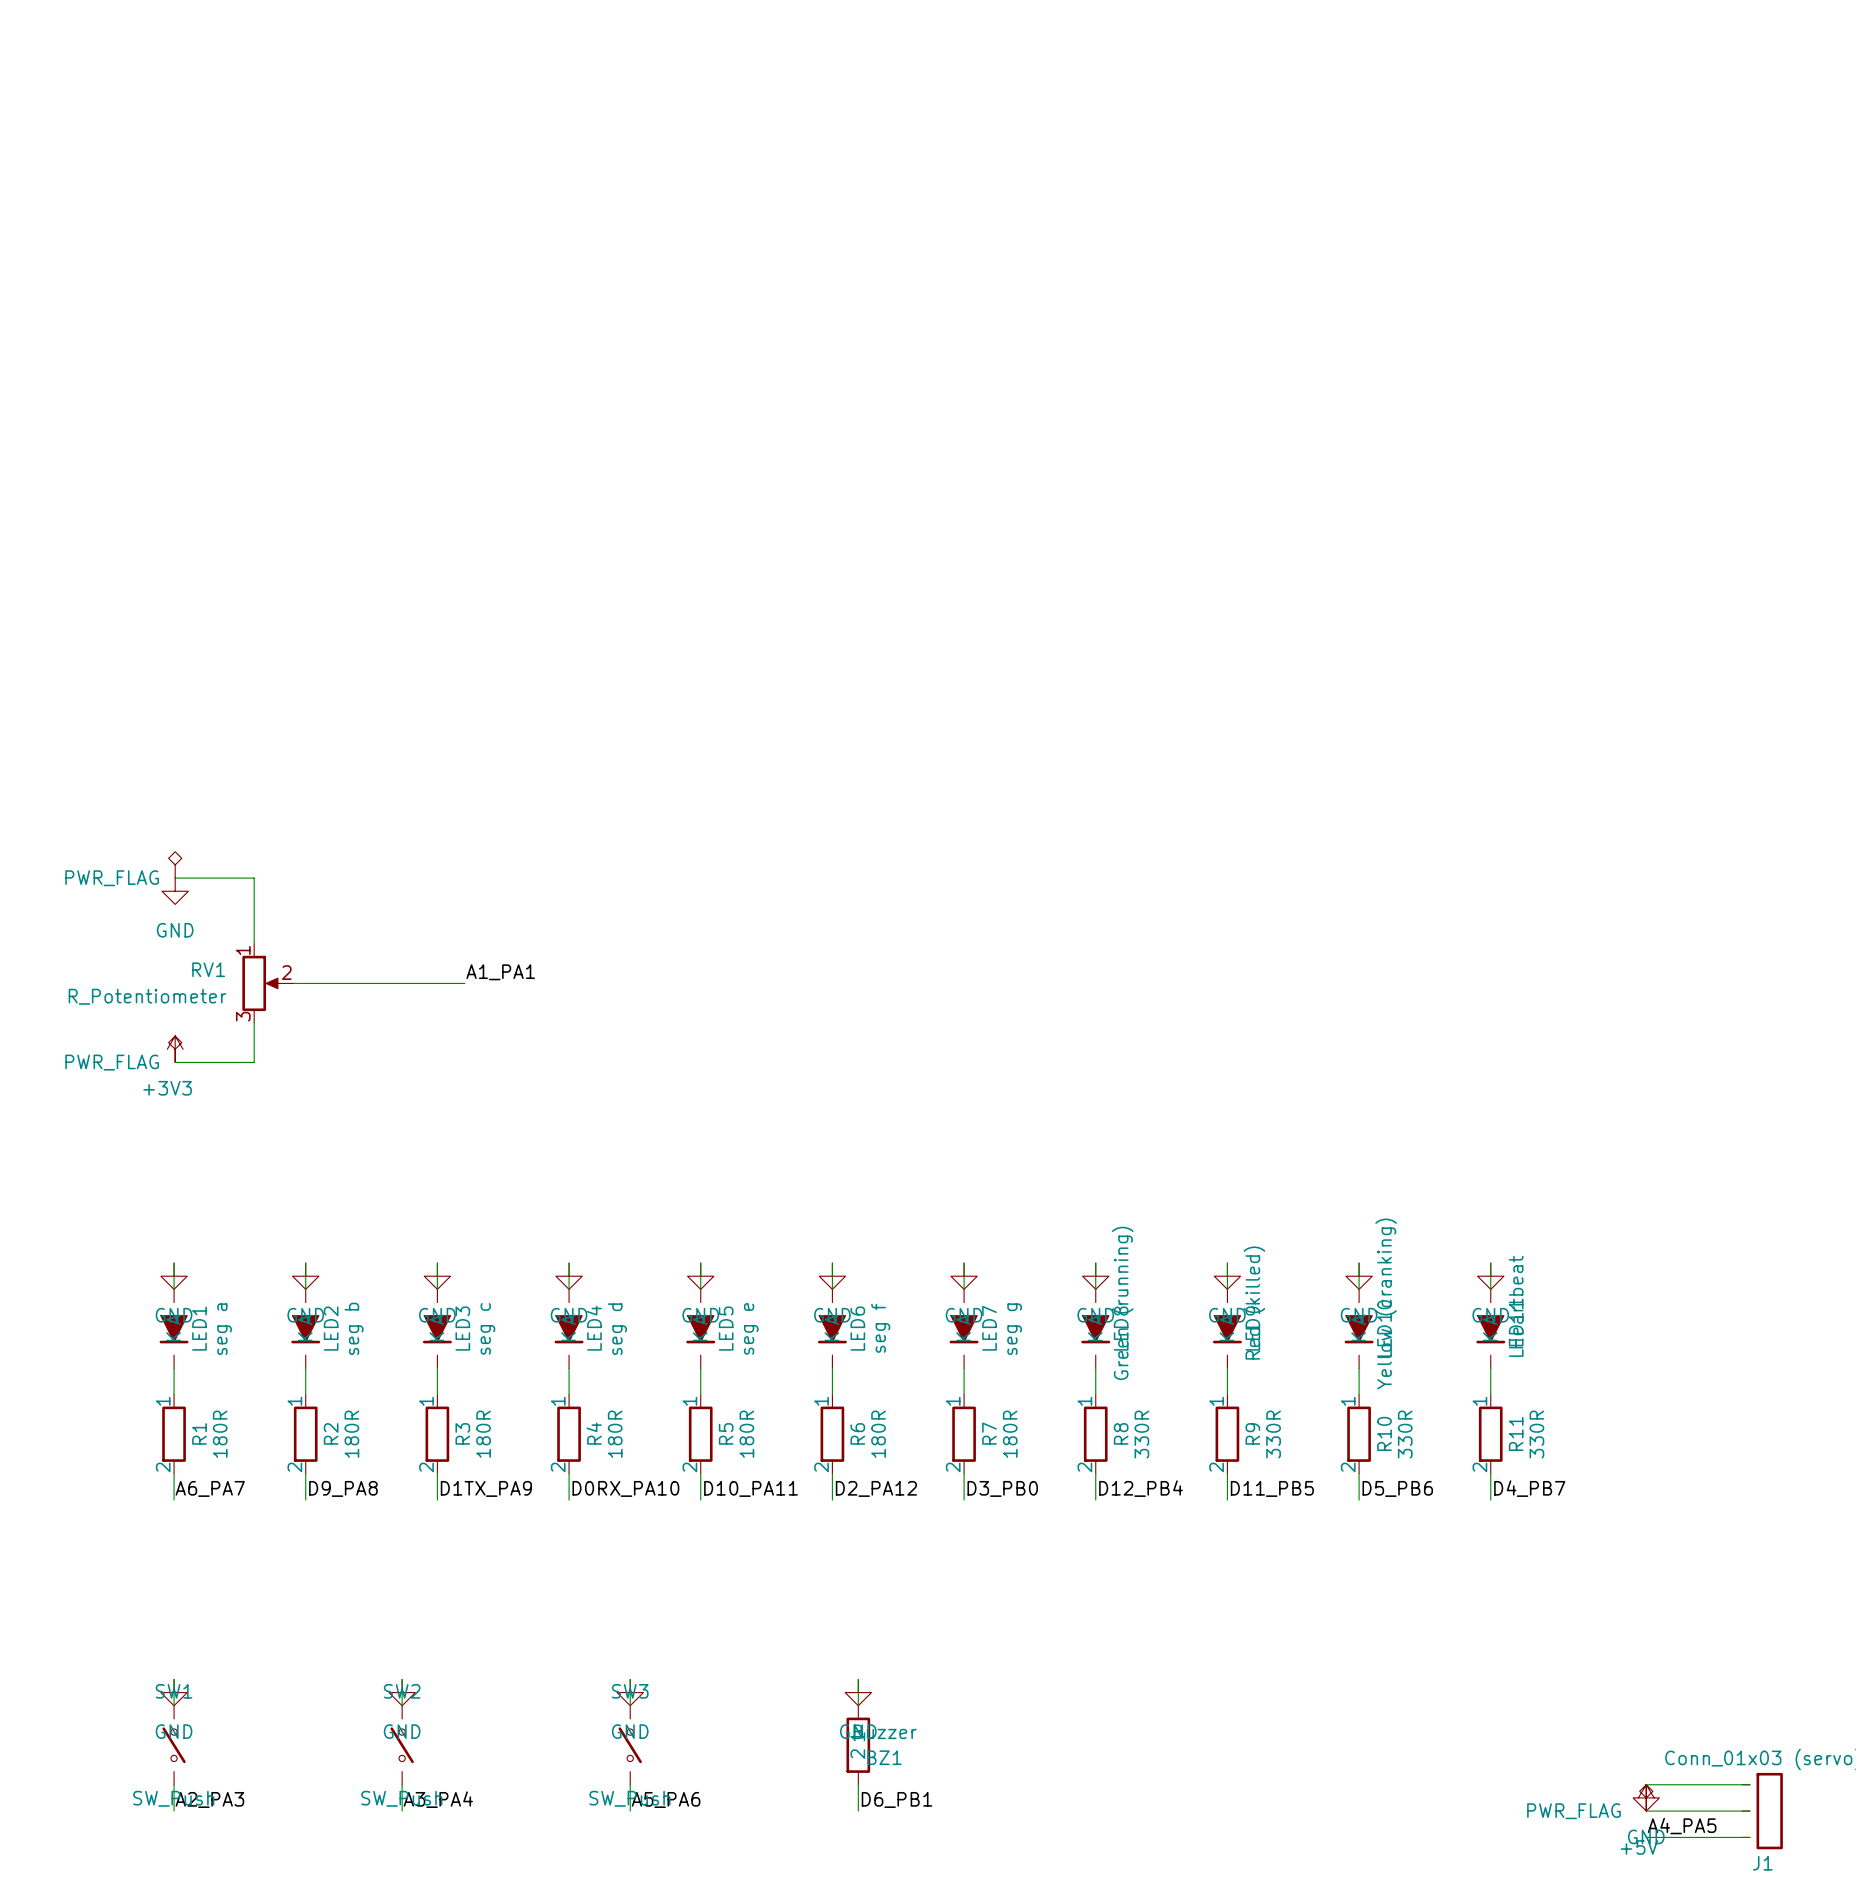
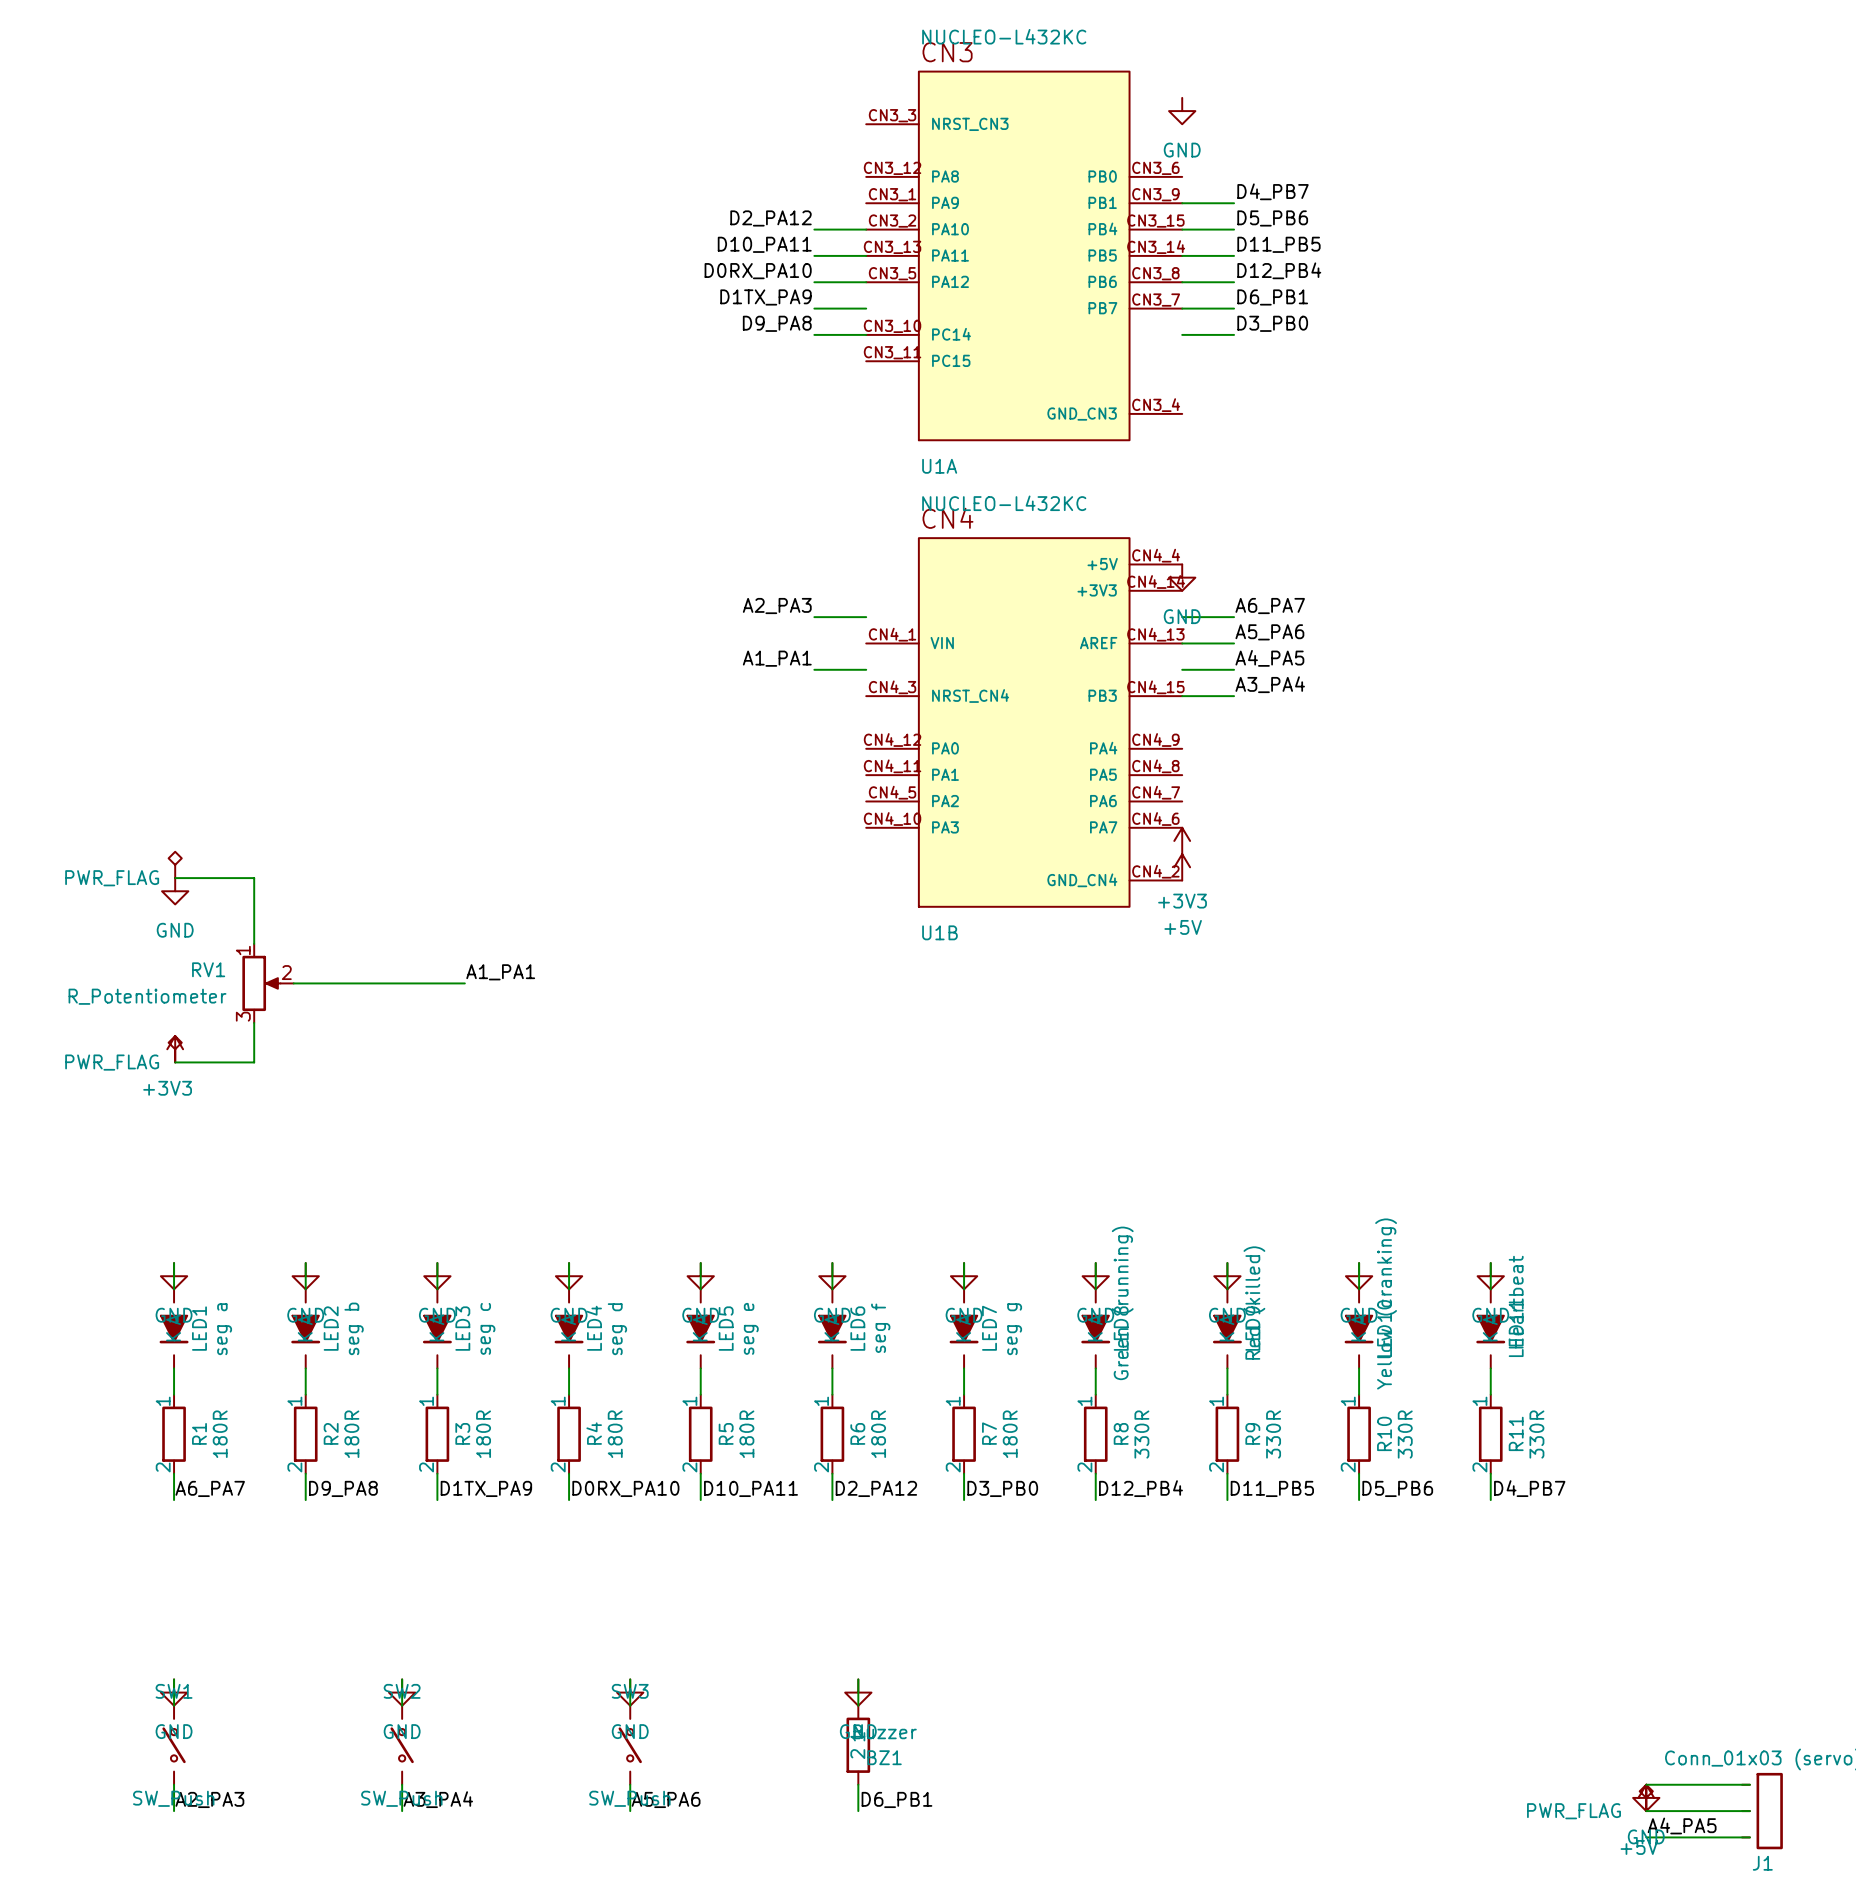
power symbol: none -> GND (1182, 111)
label: none -> D4_PB7 (1273, 191)
wire: none -> (1182, 203) (1234, 203)
label: none -> D2_PA12 (771, 218)
label: none -> D5_PB6 (1272, 218)
wire: none -> (814, 229) (866, 229)
wire: none -> (1182, 229) (1234, 229)
label: none -> D10_PA11 (764, 244)
label: none -> D11_PB5 (1278, 244)
wire: none -> (814, 255) (866, 255)
U1A: none -> NUCLEO-L432KC (1024, 255)
wire: none -> (1182, 255) (1234, 255)
label: none -> D12_PB4 (1279, 270)
label: none -> D0RX_PA10 (758, 271)
wire: none -> (814, 282) (866, 282)
wire: none -> (1182, 282) (1234, 282)
label: none -> D1TX_PA9 (765, 297)
label: none -> D6_PB1 (1272, 297)
wire: none -> (814, 308) (866, 308)
wire: none -> (1182, 308) (1234, 308)
label: none -> D9_PA8 (777, 323)
label: none -> D3_PB0 (1272, 323)
wire: none -> (814, 334) (866, 334)
wire: none -> (1182, 334) (1234, 334)
power symbol: none -> GND (1182, 577)
label: none -> A2_PA3 (777, 606)
label: none -> A6_PA7 (1270, 606)
wire: none -> (814, 617) (866, 617)
wire: none -> (1182, 617) (1234, 617)
label: none -> A5_PA6 (1269, 632)
wire: none -> (1182, 643) (1234, 643)
label: none -> A1_PA1 (777, 658)
label: none -> A4_PA5 (1269, 658)
wire: none -> (814, 669) (866, 669)
wire: none -> (1182, 669) (1234, 669)
label: none -> A3_PA4 (1270, 684)
wire: none -> (1182, 696) (1234, 696)
U1B: none -> NUCLEO-L432KC (1024, 722)
power symbol: none -> +3V3 (1182, 840)
power symbol: none -> +5V (1182, 867)

